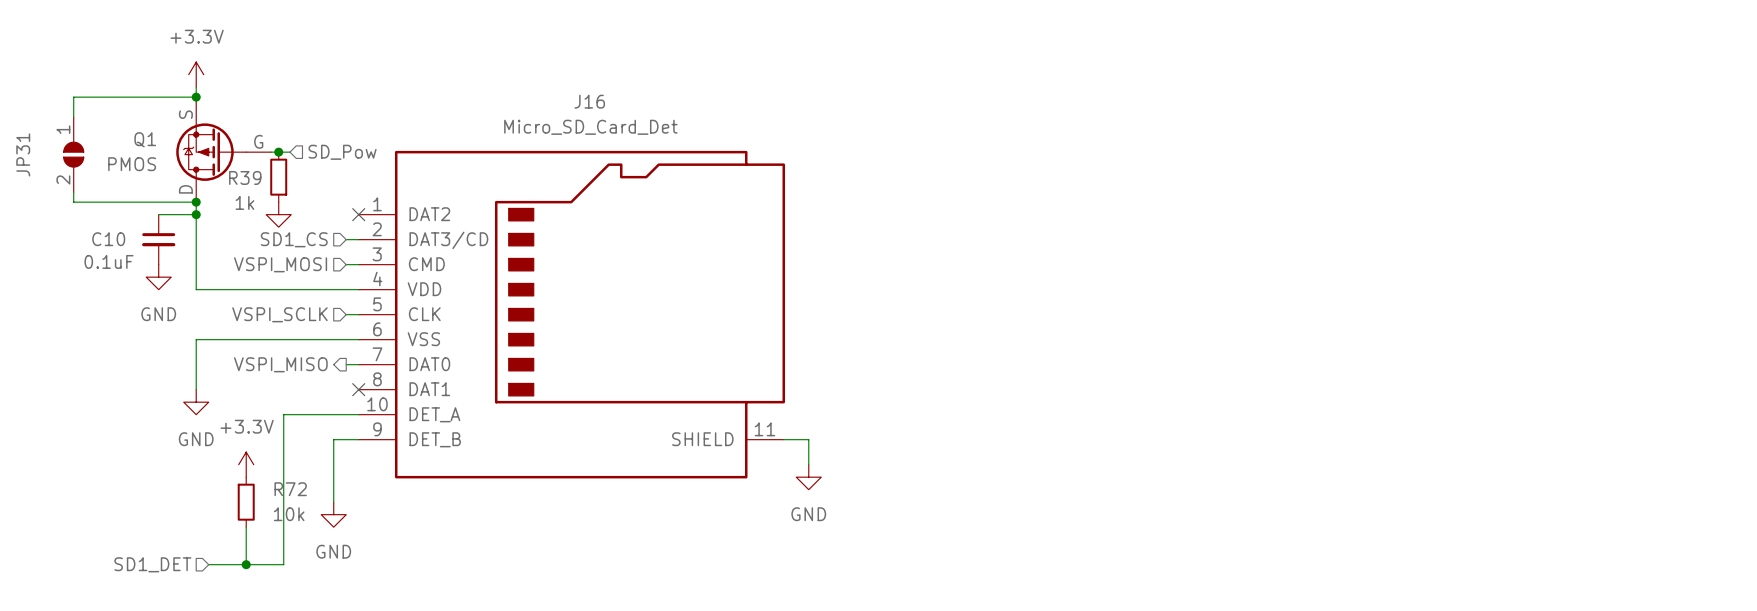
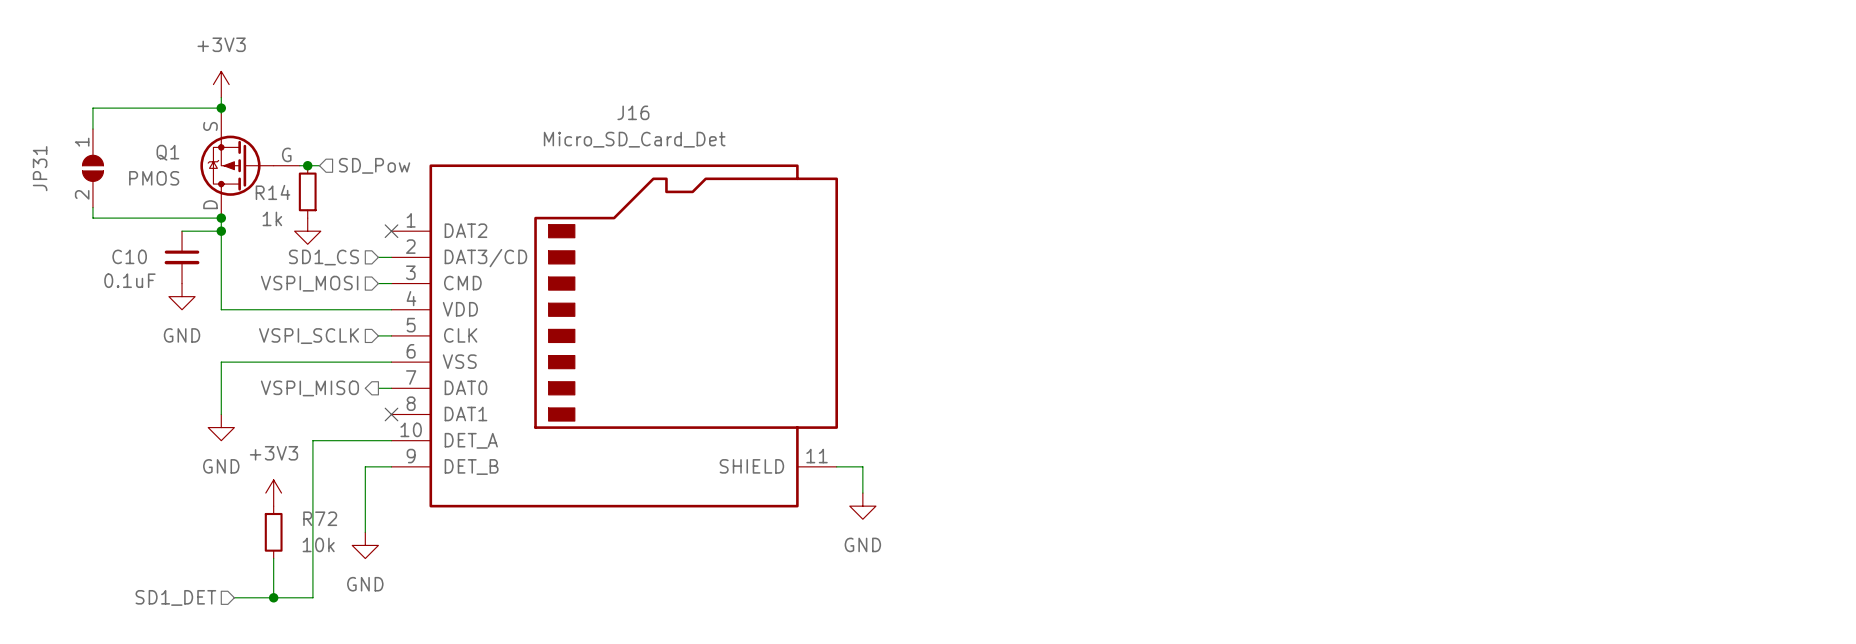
power symbol: +3.3V (196, 74) -> +3V3 (221, 84)
R39 name: R39 (245, 177) -> R14 (272, 192)
power symbol: +3.3V (246, 464) -> +3V3 (273, 493)

